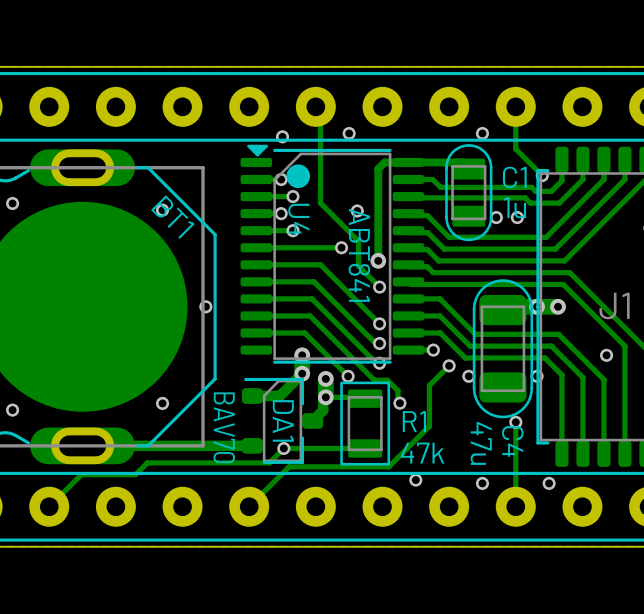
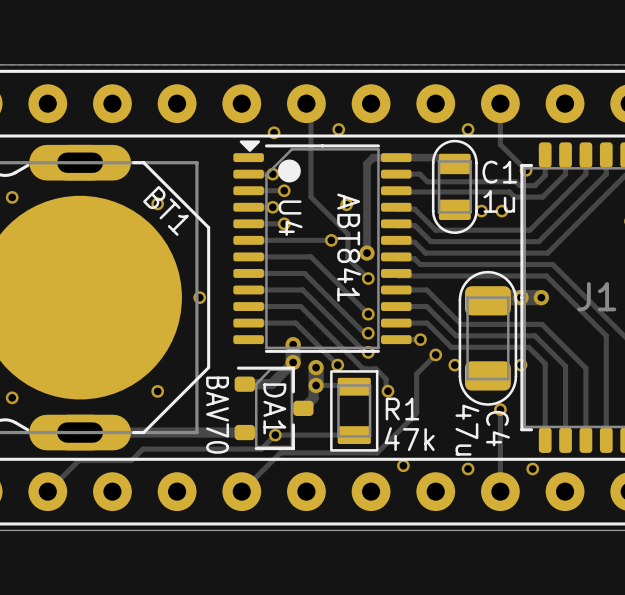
via: (606, 355) -> none

